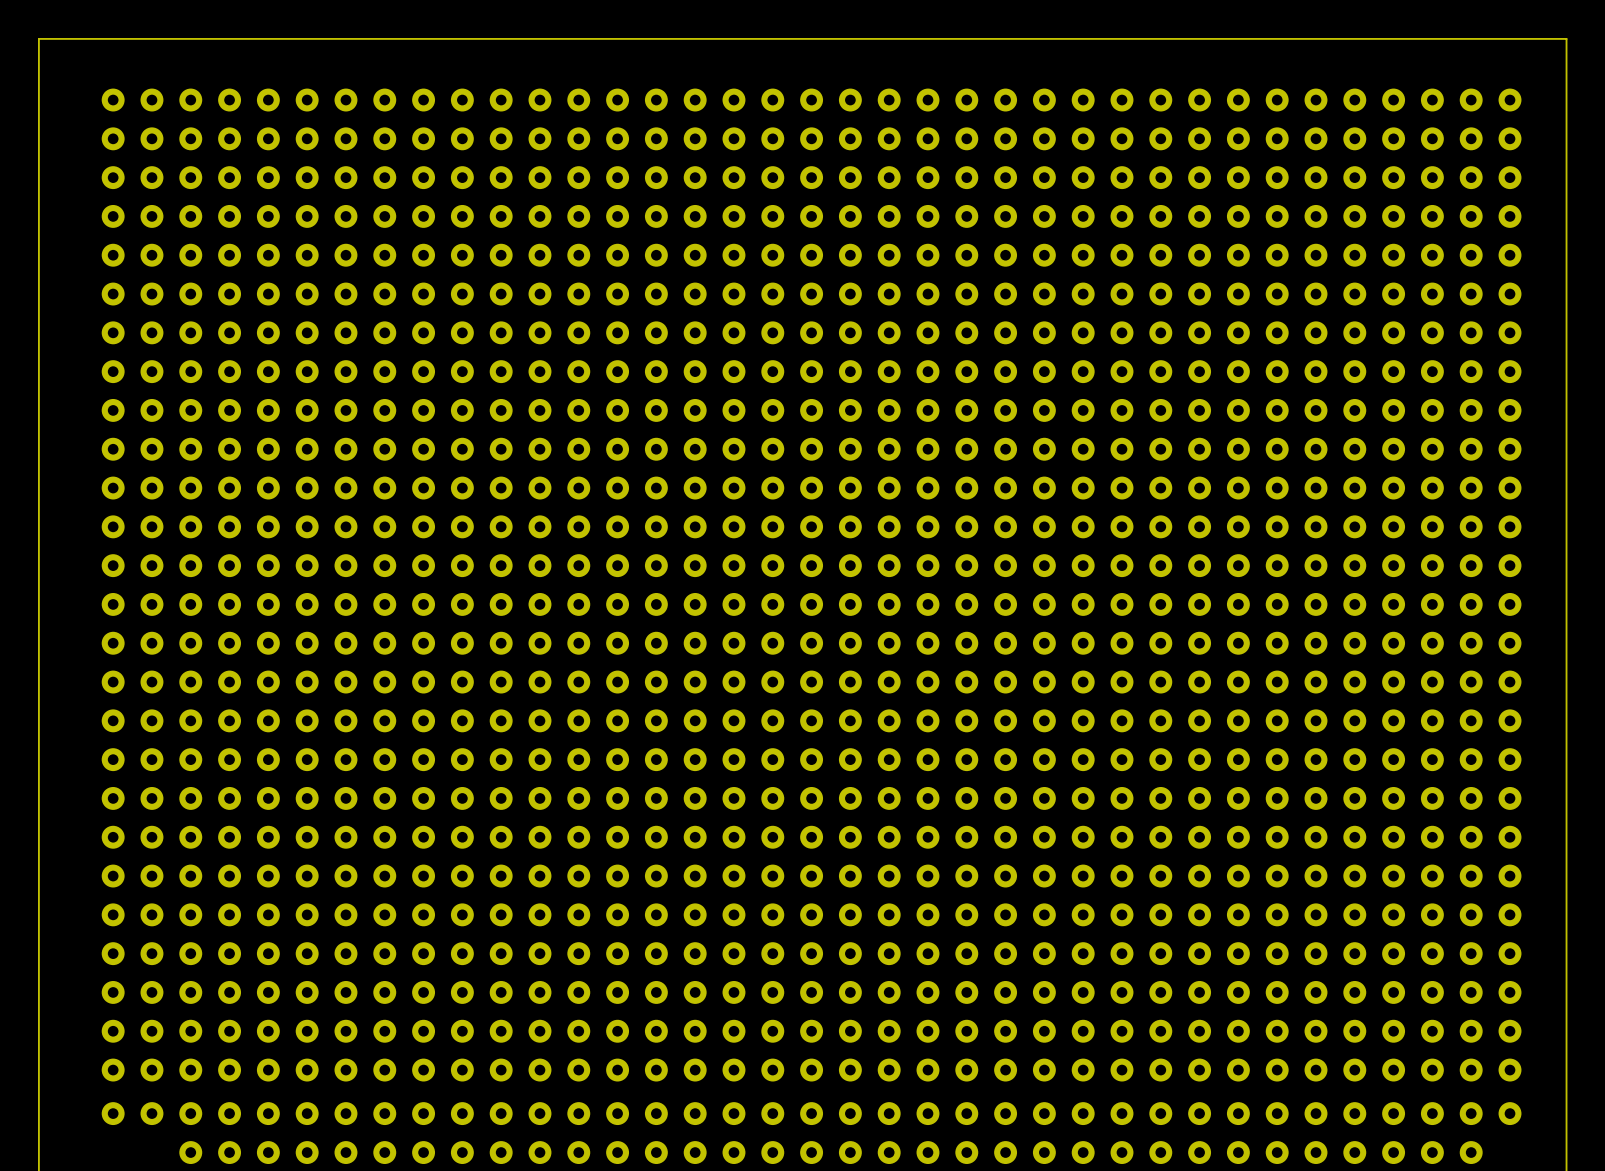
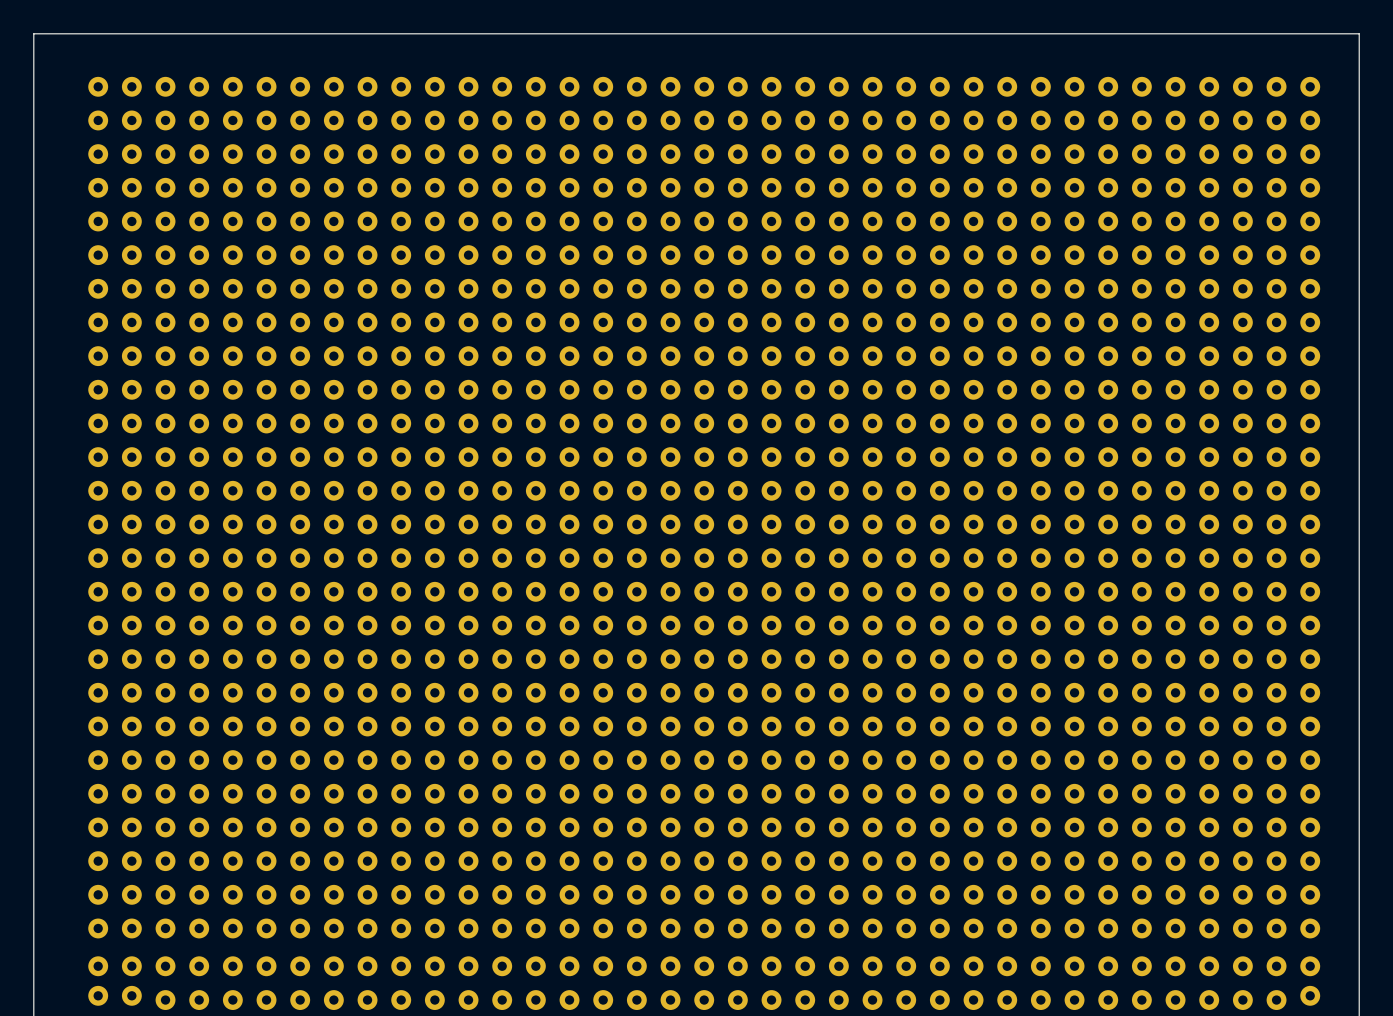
part: none -> (98, 995)
part: none -> (131, 995)
part: none -> (1310, 995)

